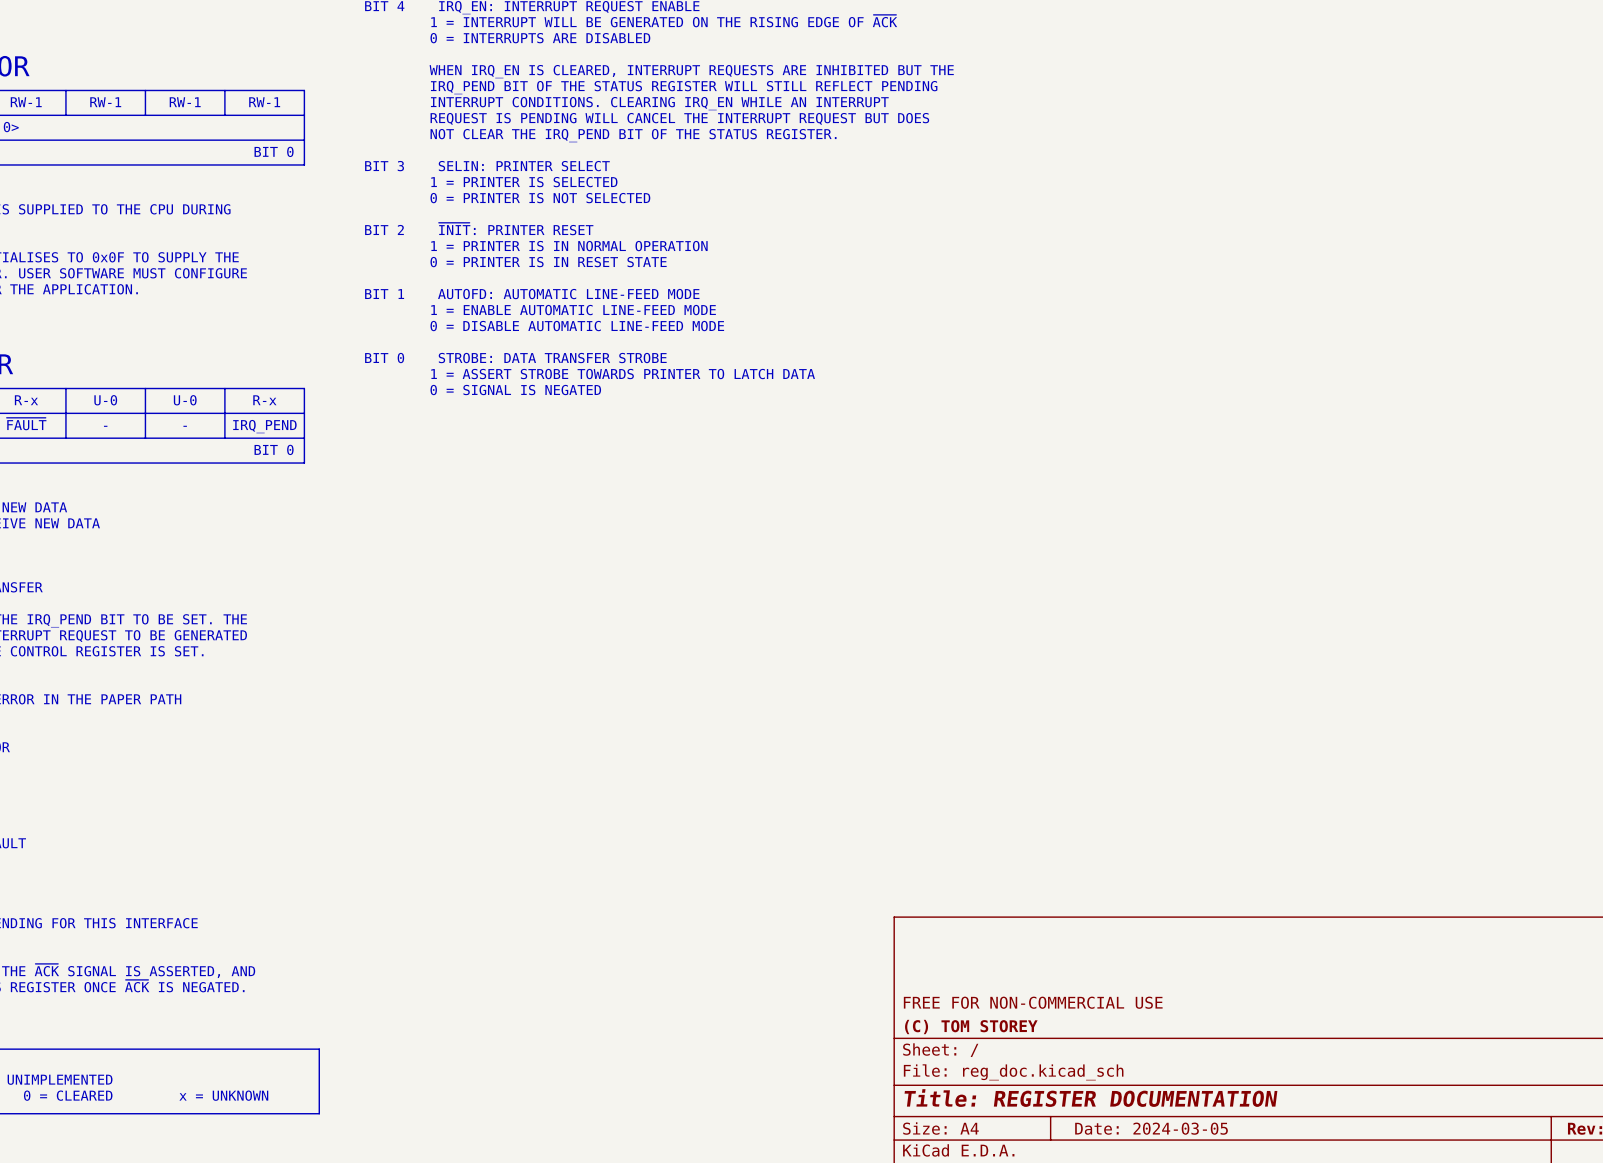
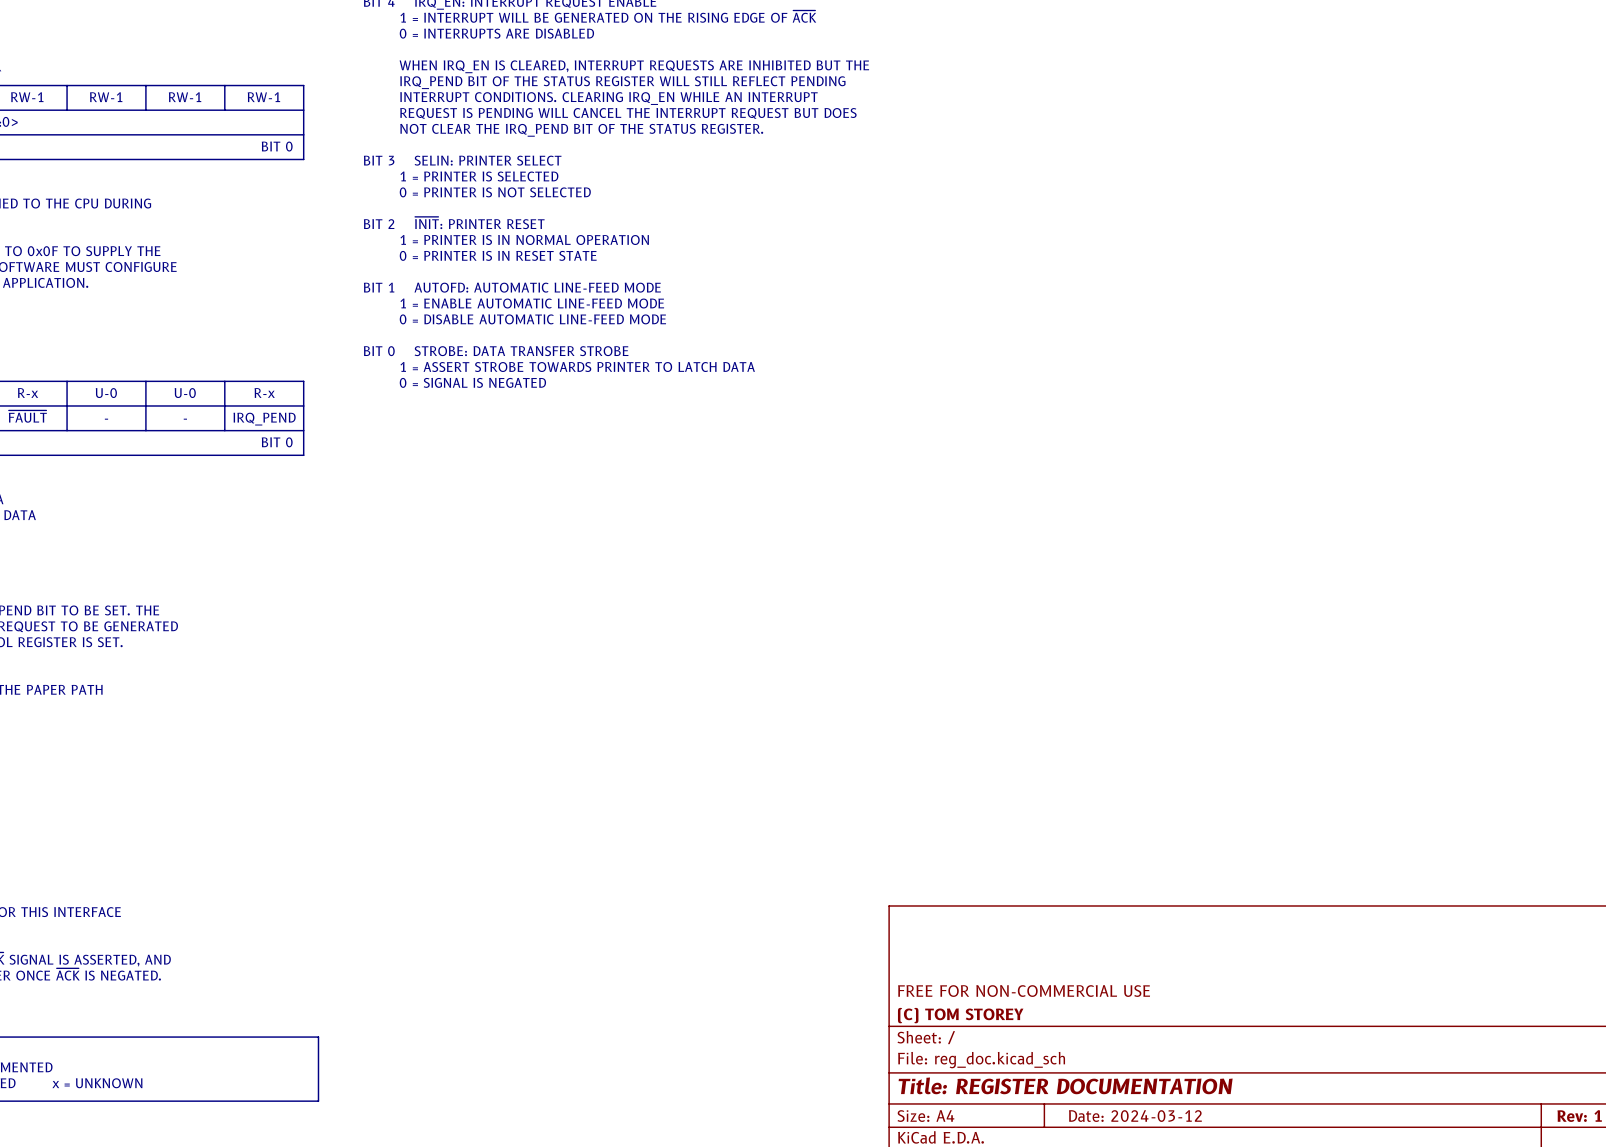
title block: Date: 2024-03-05 (1151, 1128) -> Date: 2024-03-12 (1135, 1116)

